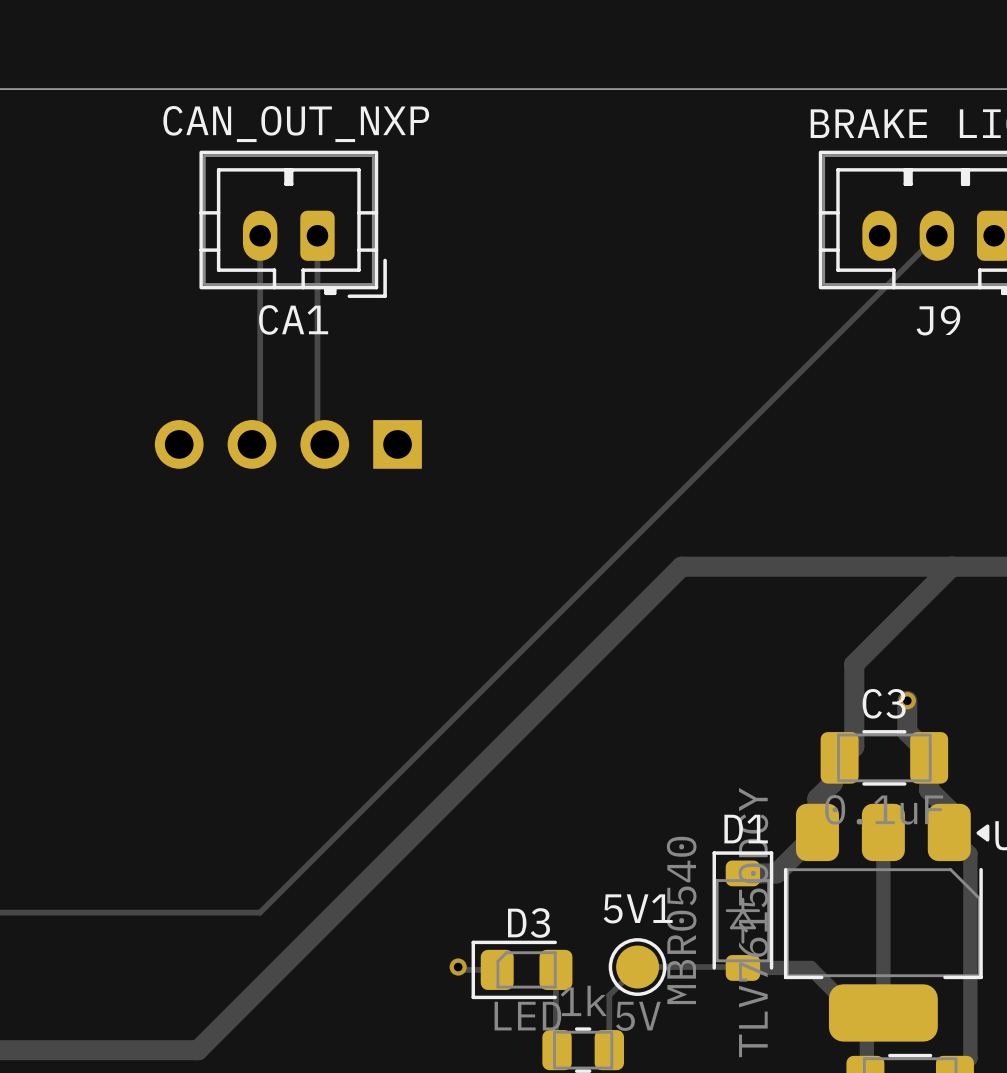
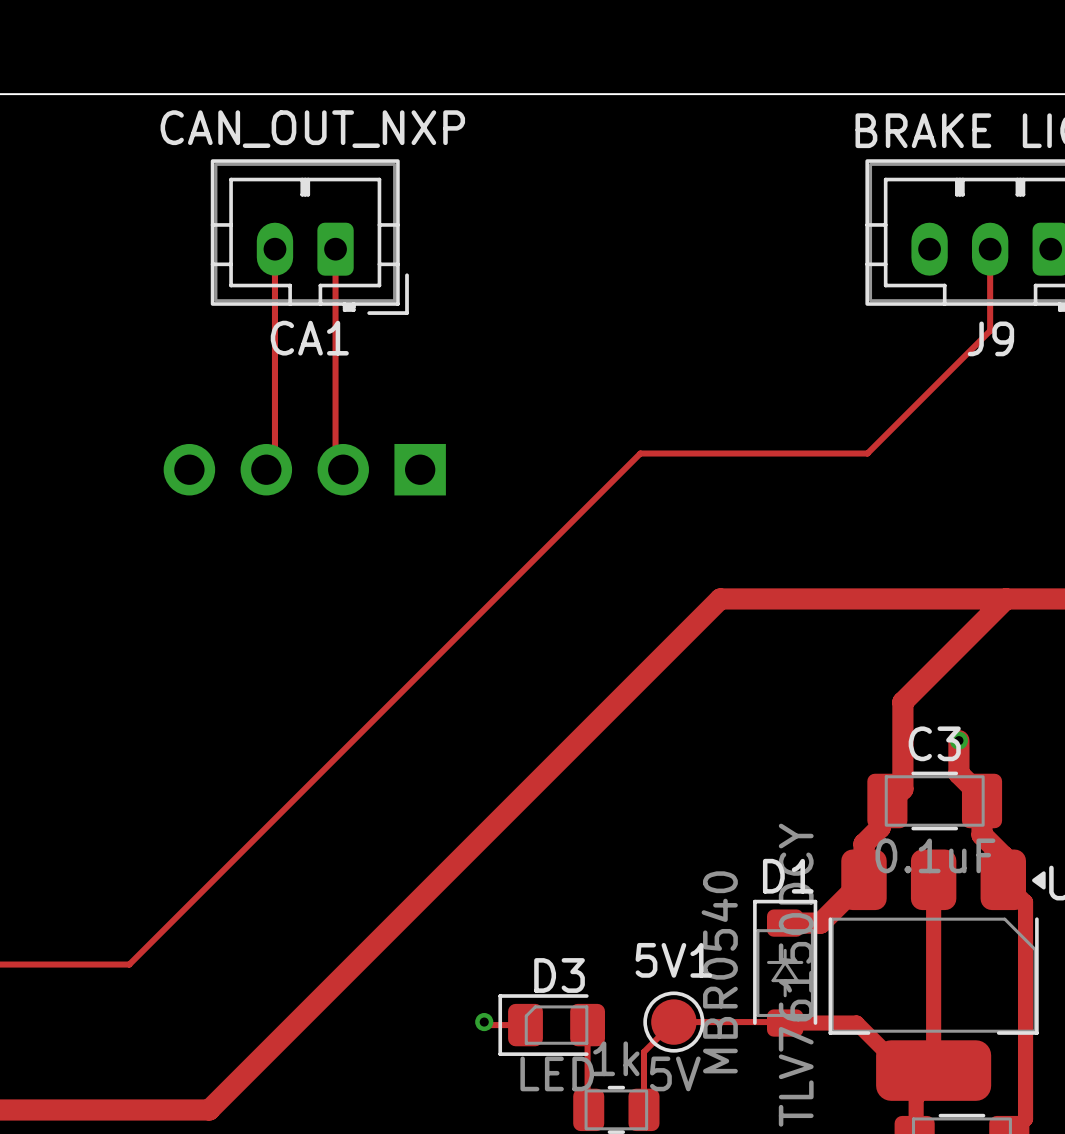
track: (936, 235) (259, 912) (122, 912) -> (990, 249) (990, 330) (867, 453) (640, 453) (129, 964)

